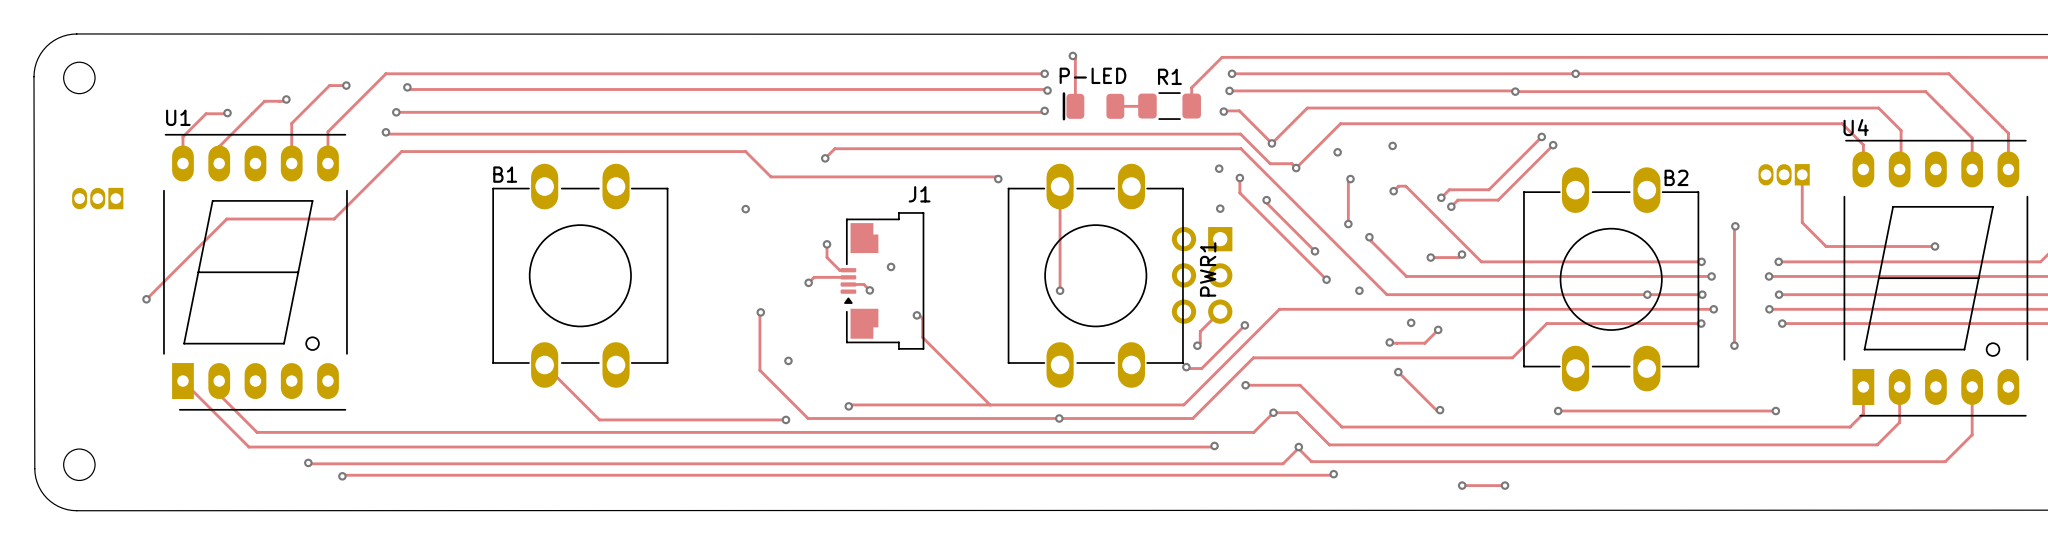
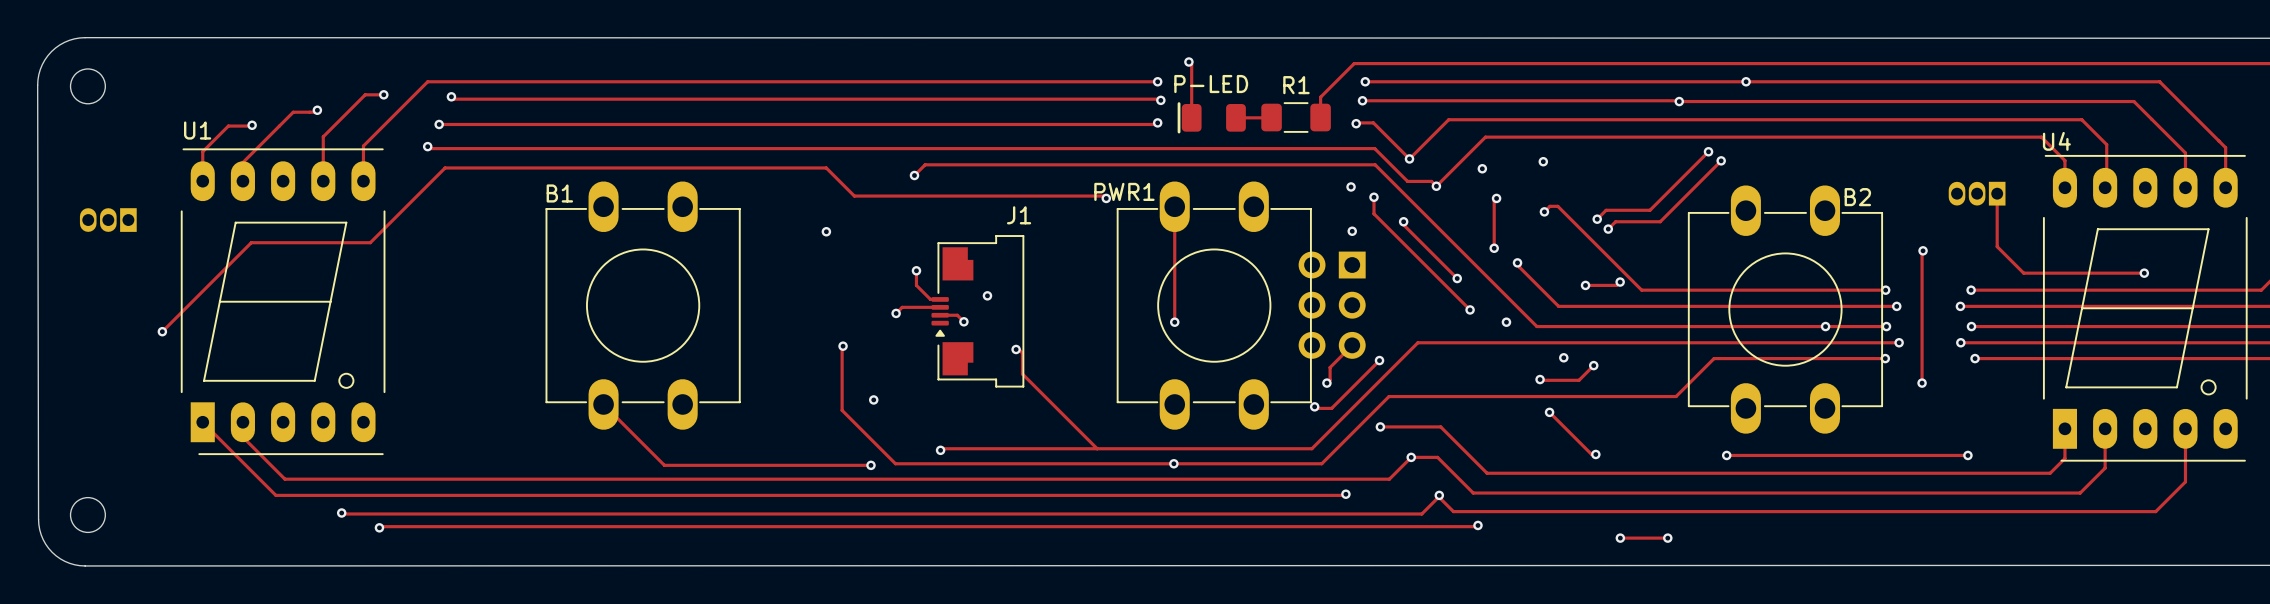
PWR1 name rotation: 0° (1208, 269) -> 90° clockwise (1124, 191)
PWR1 name position: PWR1 (1208, 269) -> PWR1 (1124, 191)

